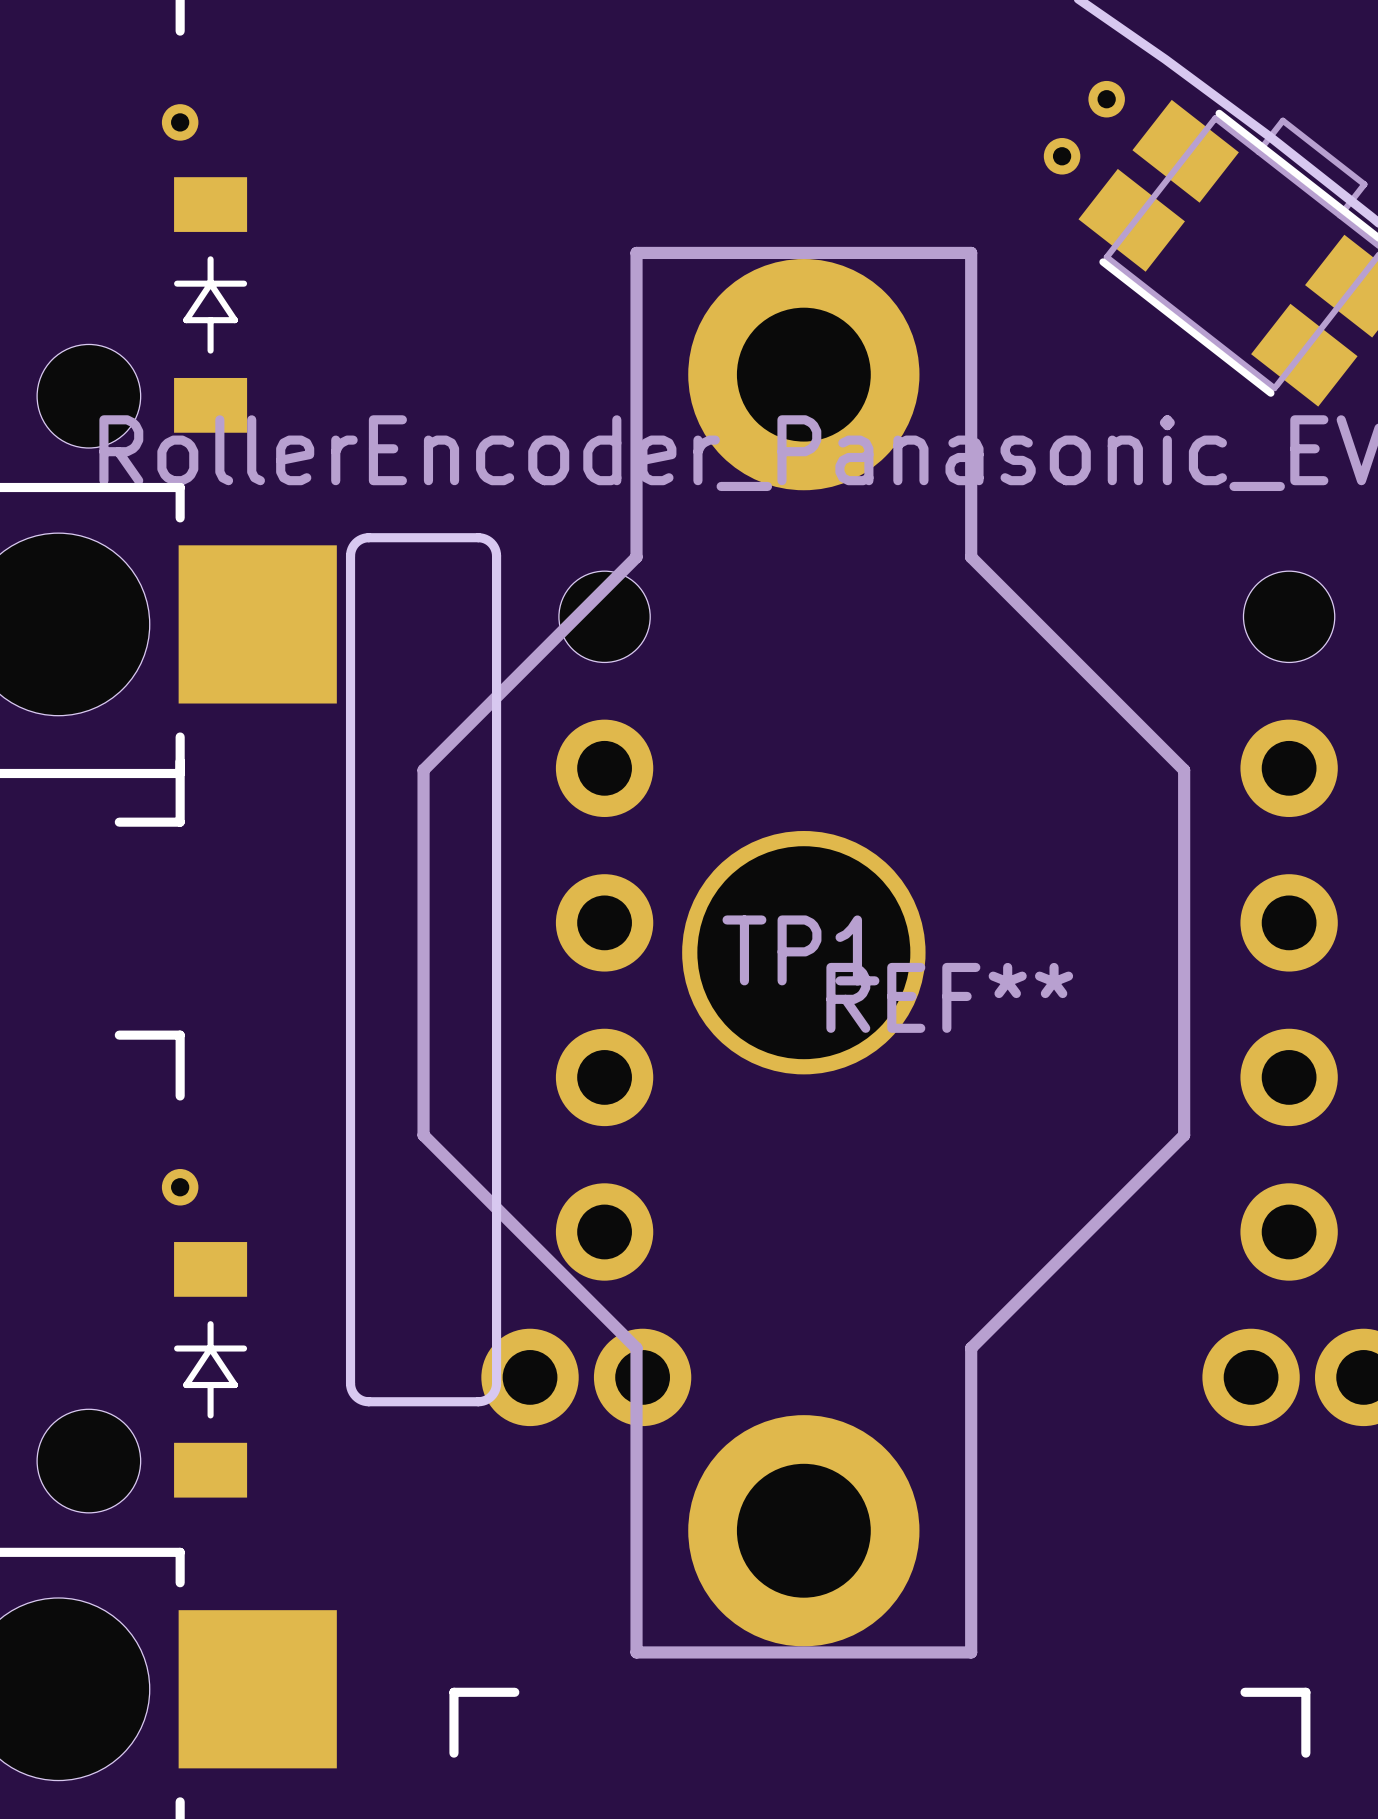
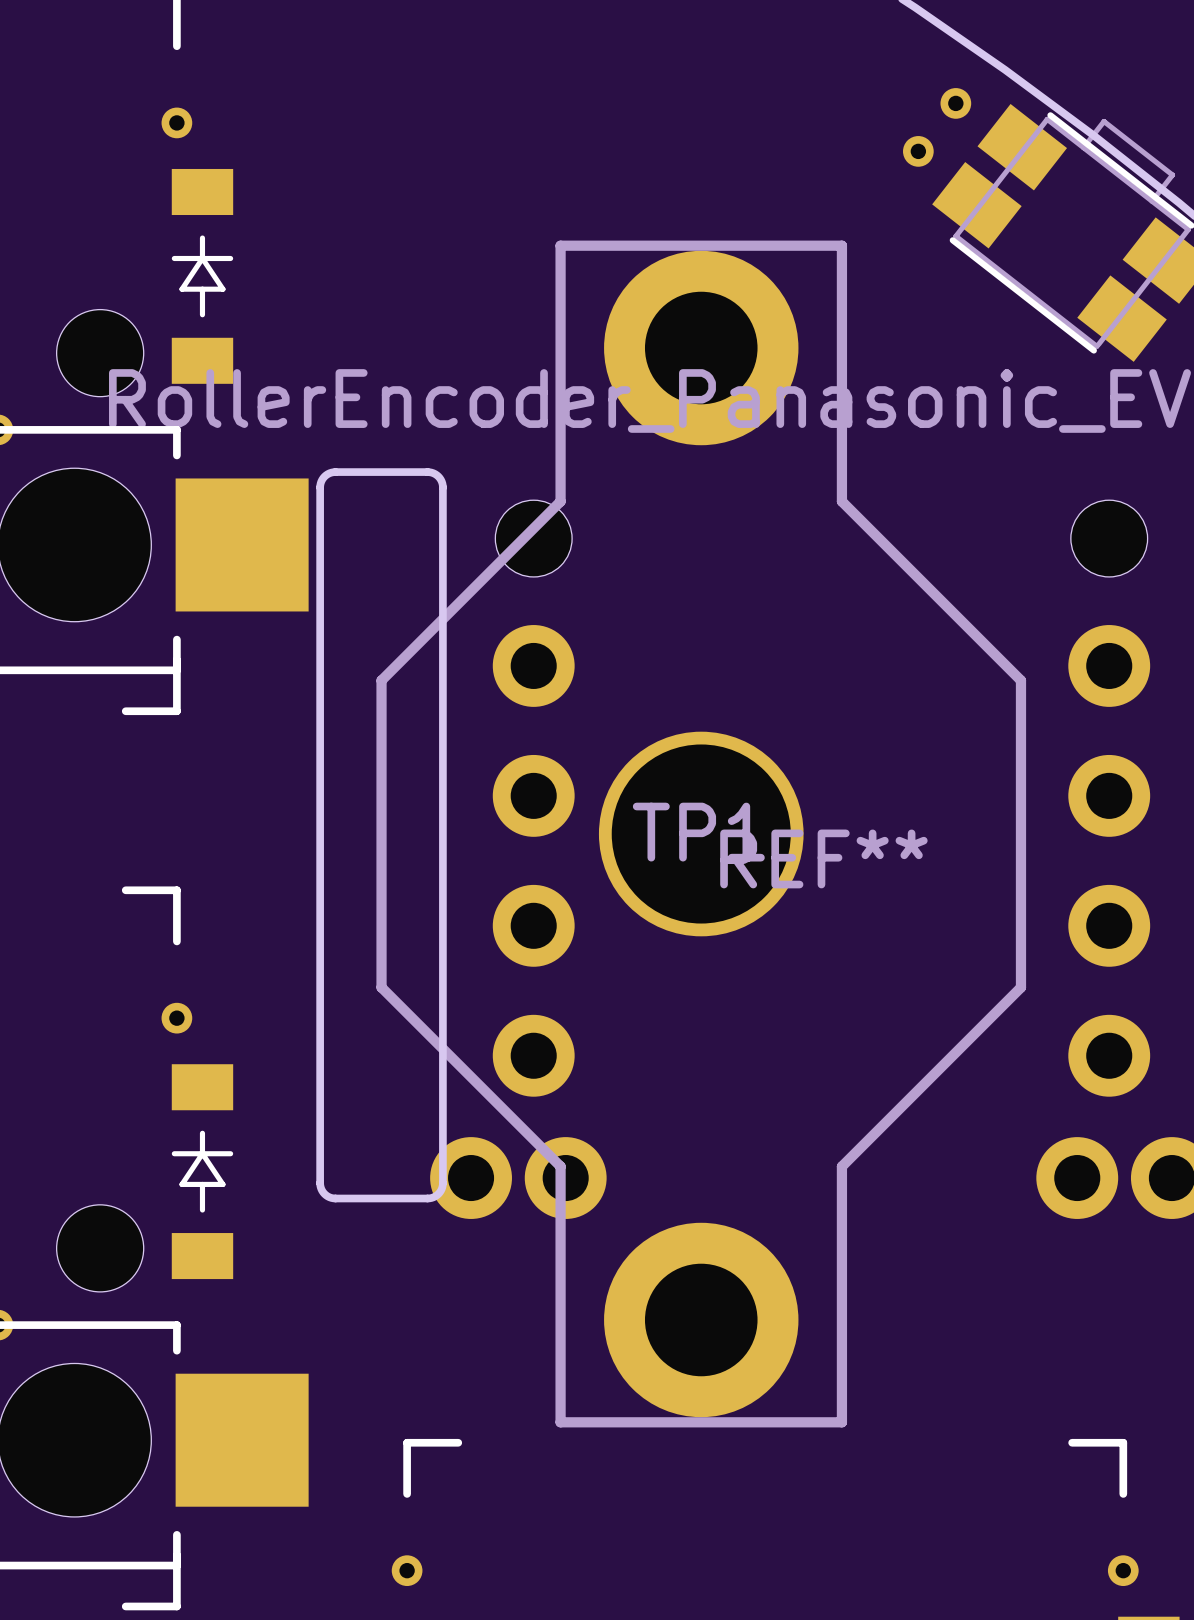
TP1 position: (803, 952) -> (701, 834)

